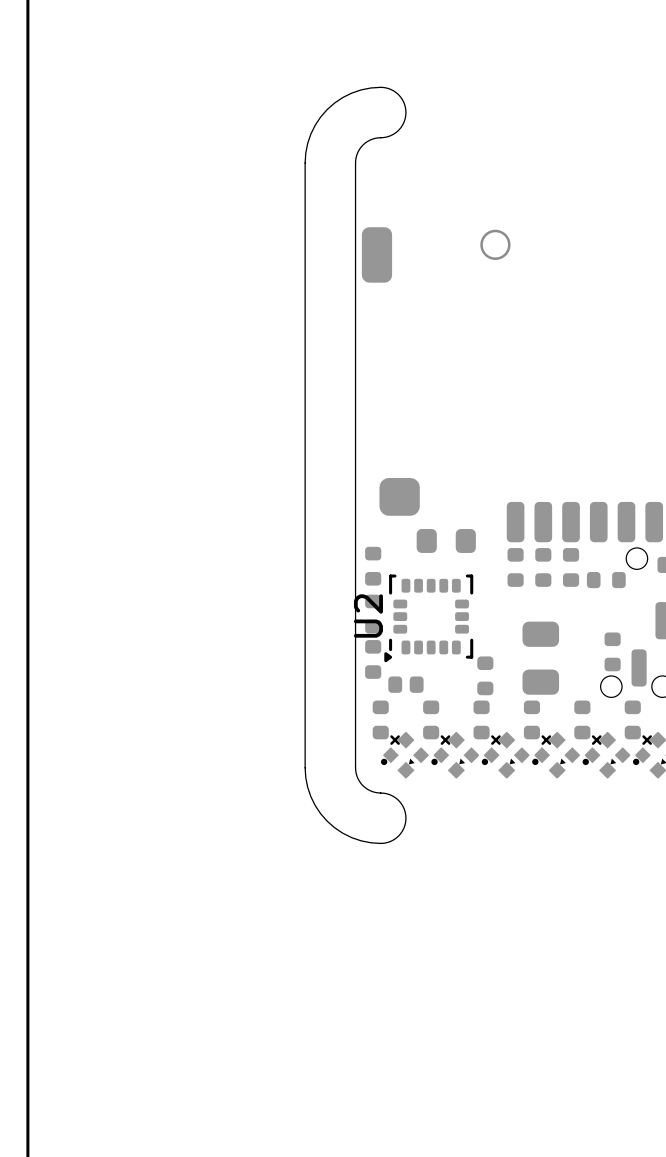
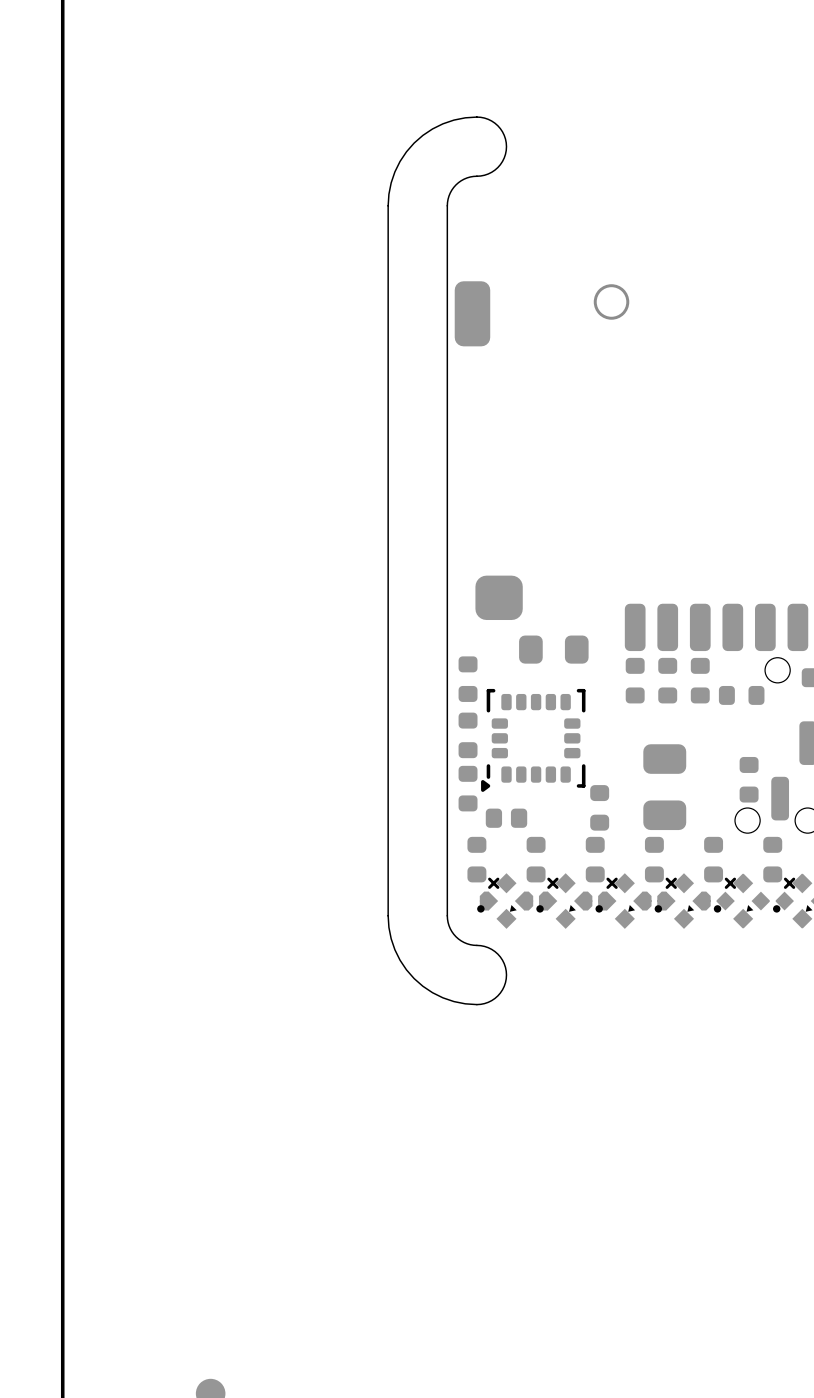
U2 name: U2 (368, 616) -> none
part footprint: [380, 732, 429, 779] -> [477, 873, 534, 929]
part footprint: [431, 732, 480, 779] -> [536, 873, 593, 929]
part footprint: [481, 732, 530, 779] -> [595, 873, 652, 929]
part footprint: [532, 732, 580, 779] -> [654, 873, 711, 929]

